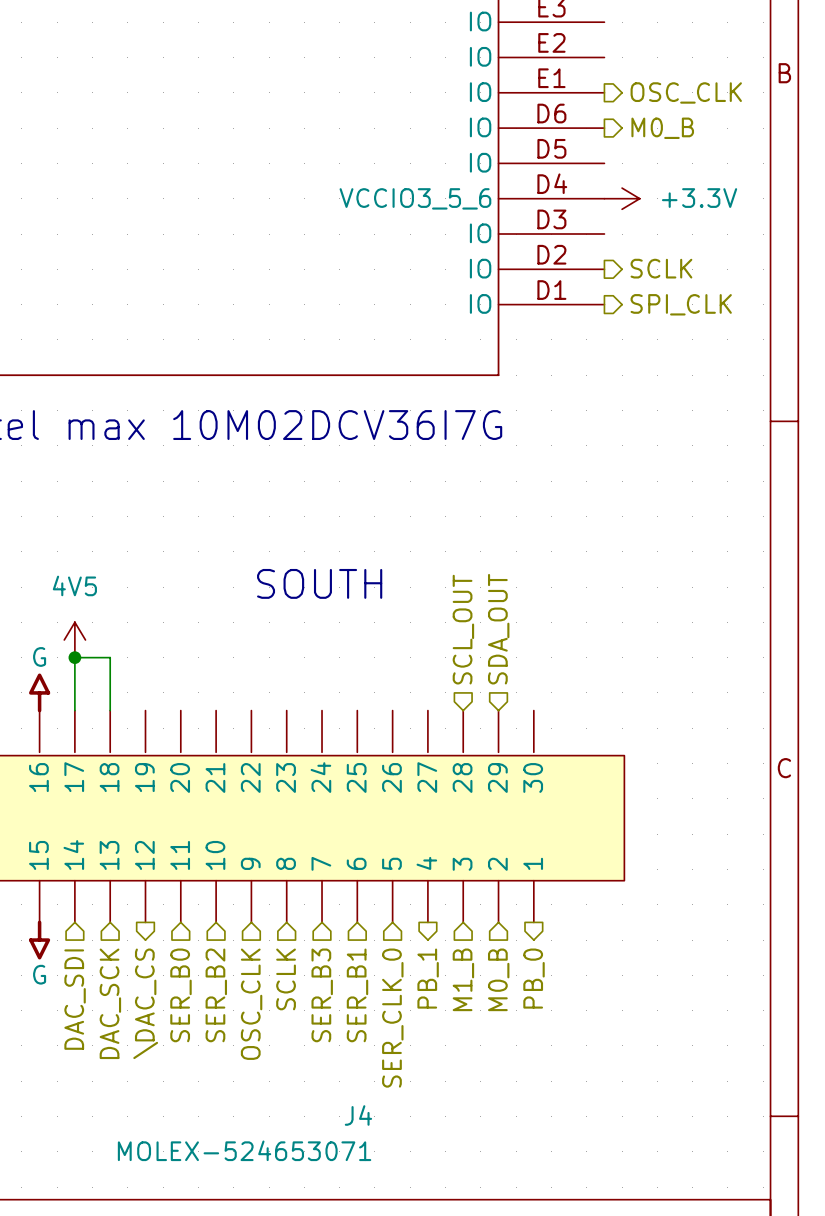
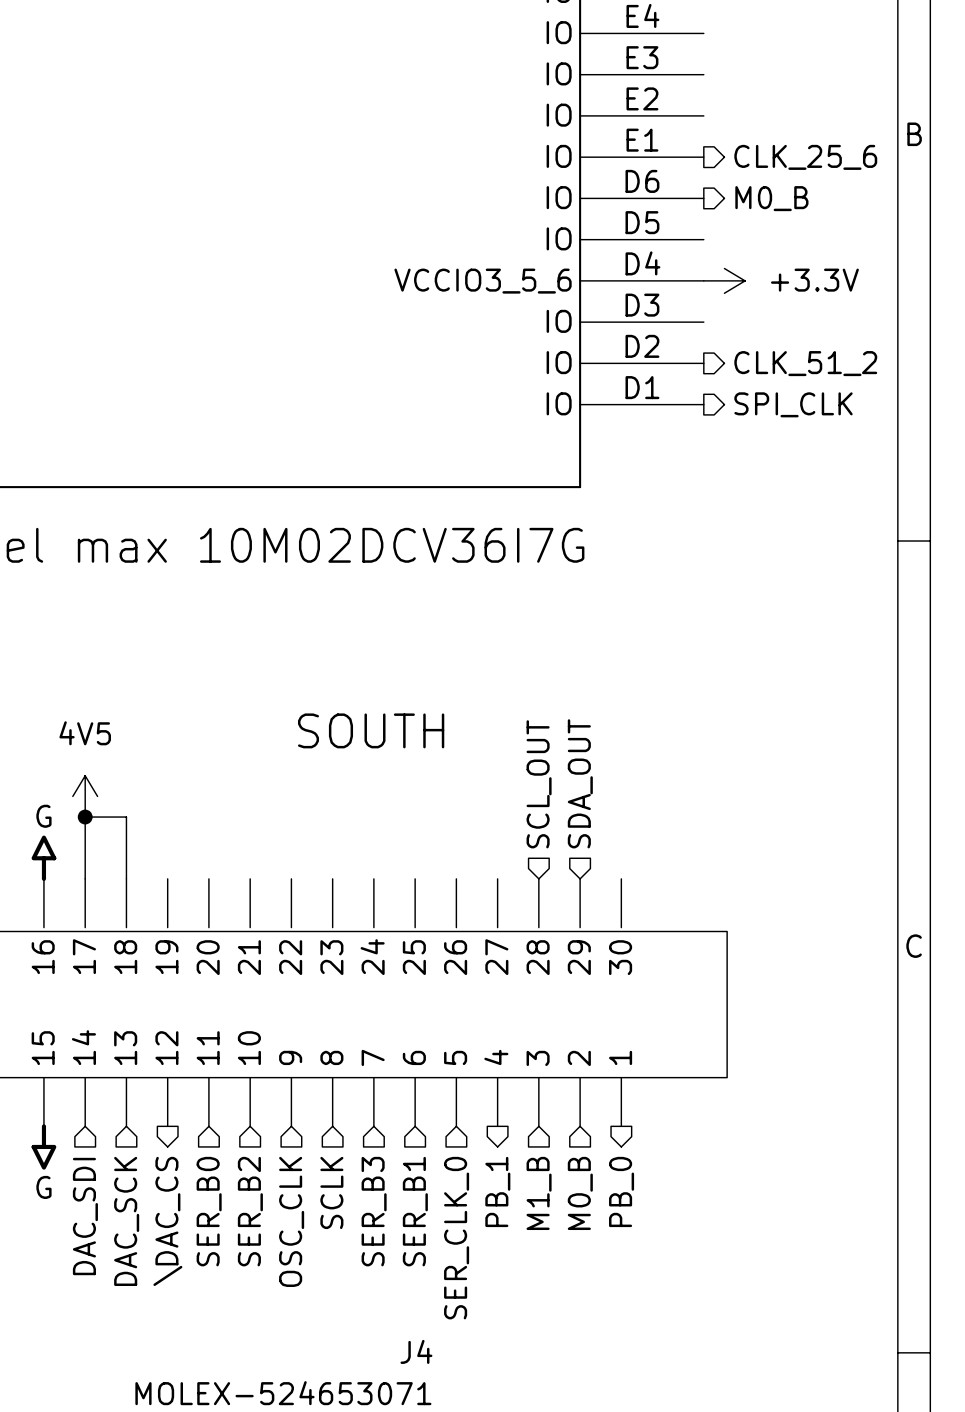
hierarchical label: OSC_CLK (686, 92) -> CLK_25_6 (805, 157)
hierarchical label: SCLK (661, 268) -> CLK_51_2 (805, 363)

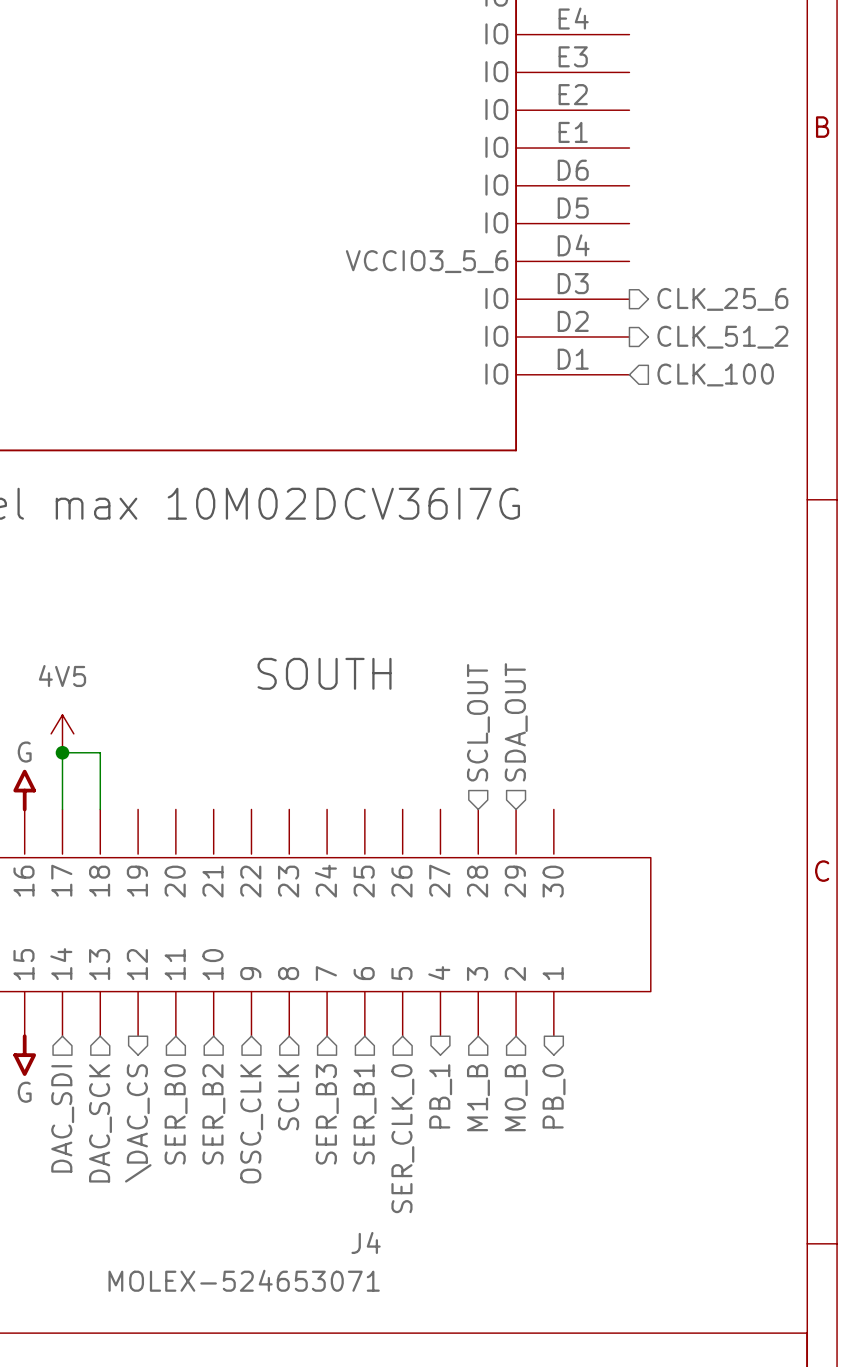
hierarchical label position: CLK_25_6 (805, 157) -> CLK_25_6 (722, 299)
hierarchical label: M0_B (771, 198) -> none
power symbol: +3.3V (724, 280) -> none
hierarchical label shape: output (793, 404) -> input (715, 374)
hierarchical label: SPI_CLK (793, 404) -> CLK_100 (715, 374)

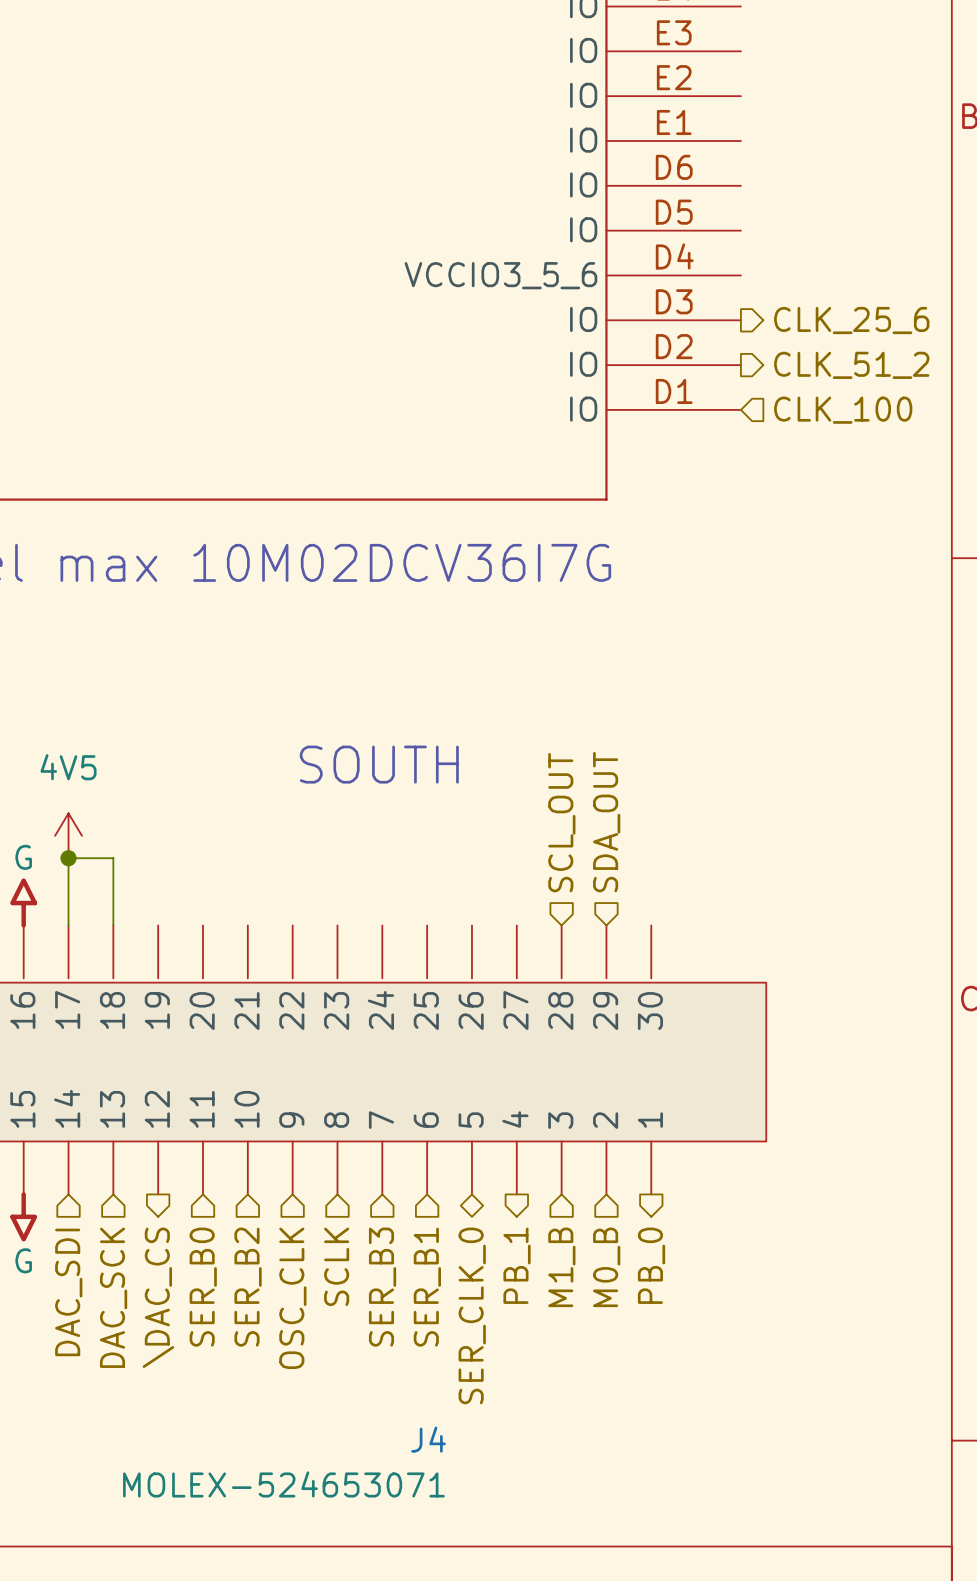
hierarchical label shape: input (402, 1138) -> bidirectional (472, 1315)

